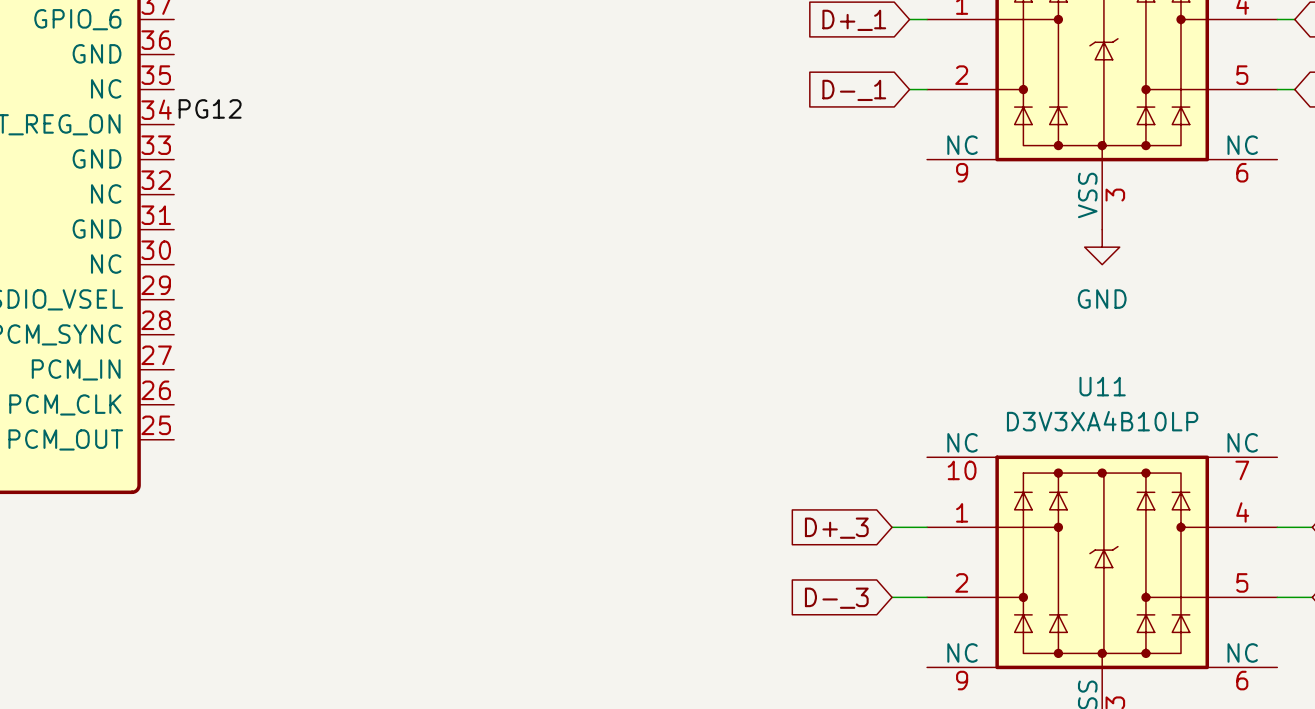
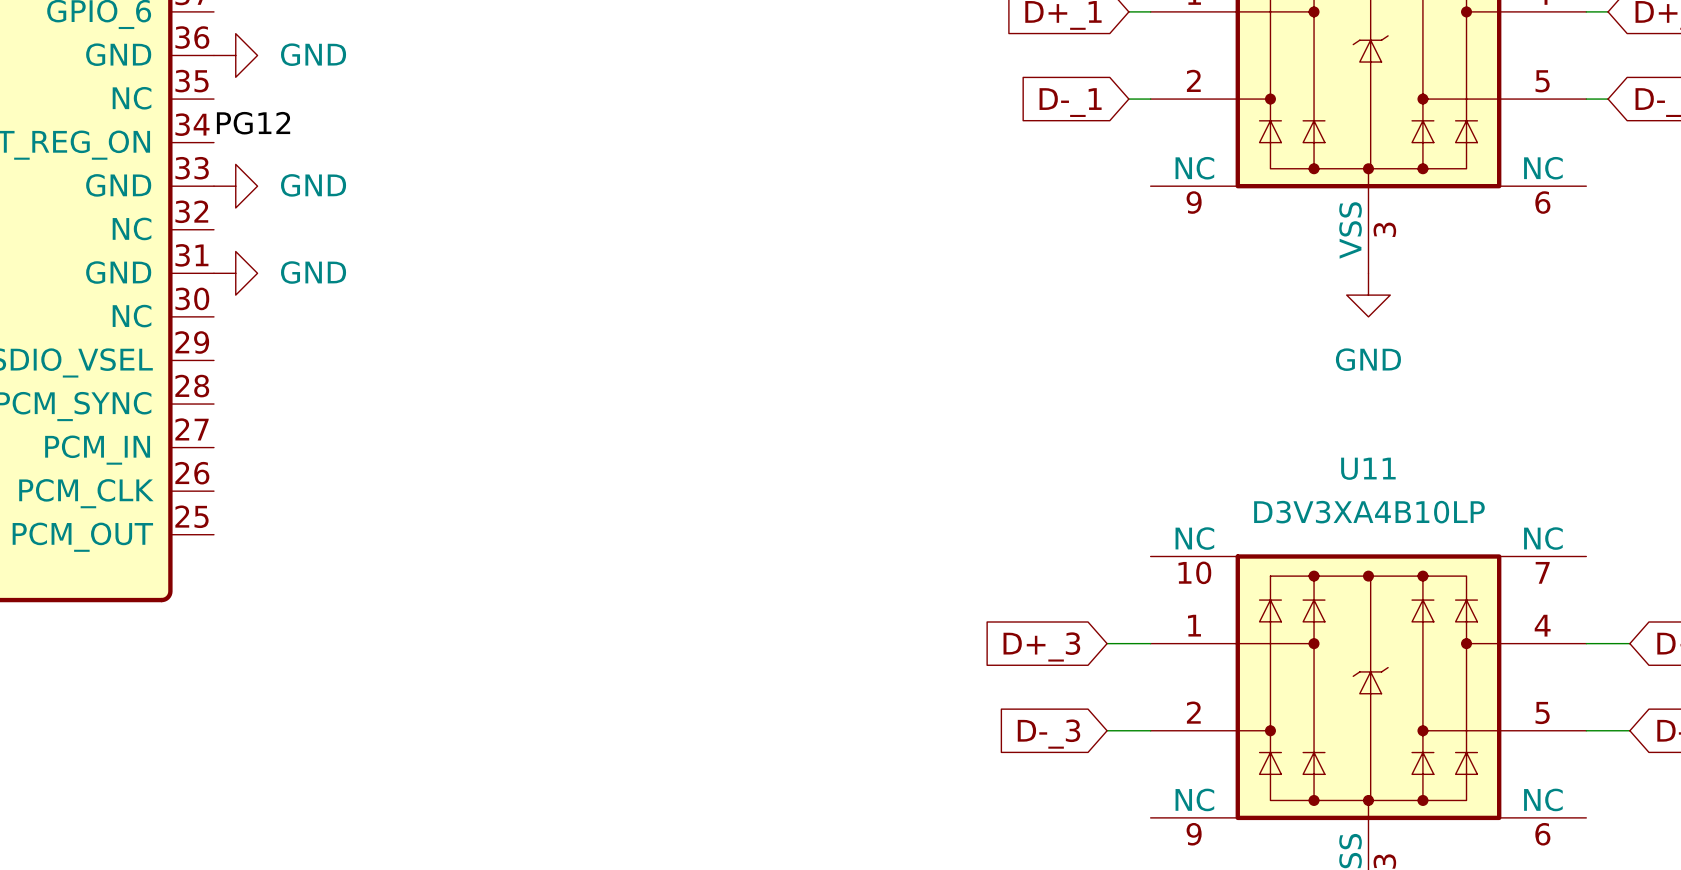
power symbol: none -> GND (235, 55)
power symbol: none -> GND (235, 186)
power symbol: none -> GND (235, 273)

